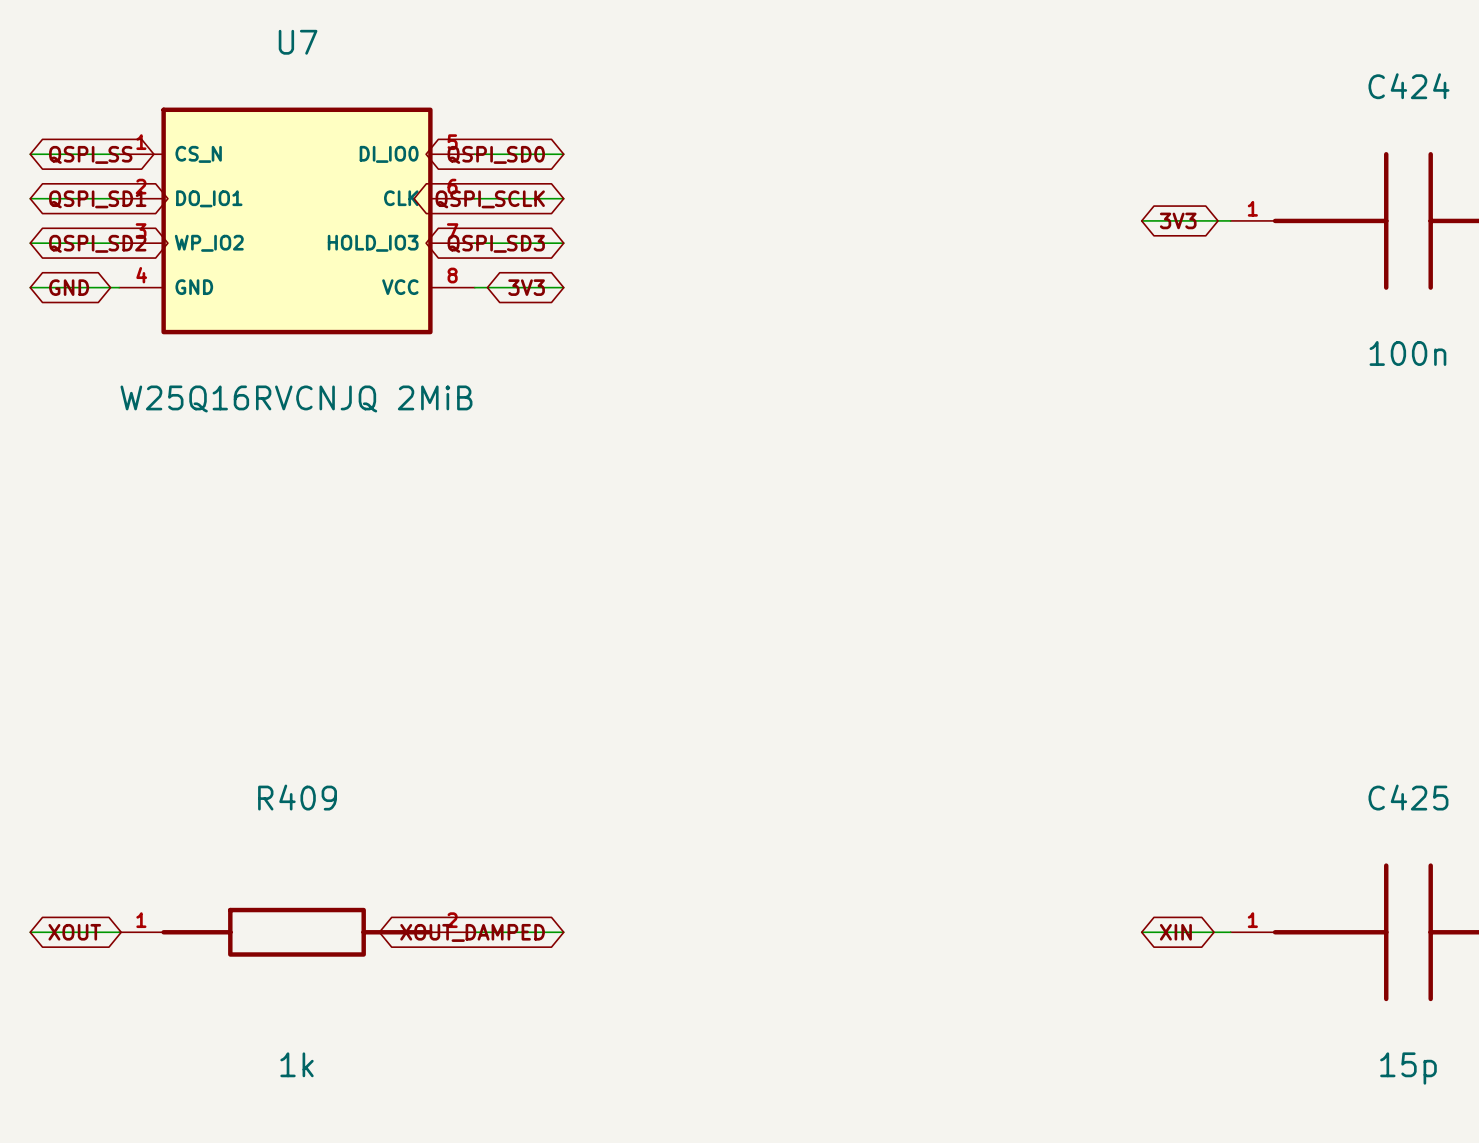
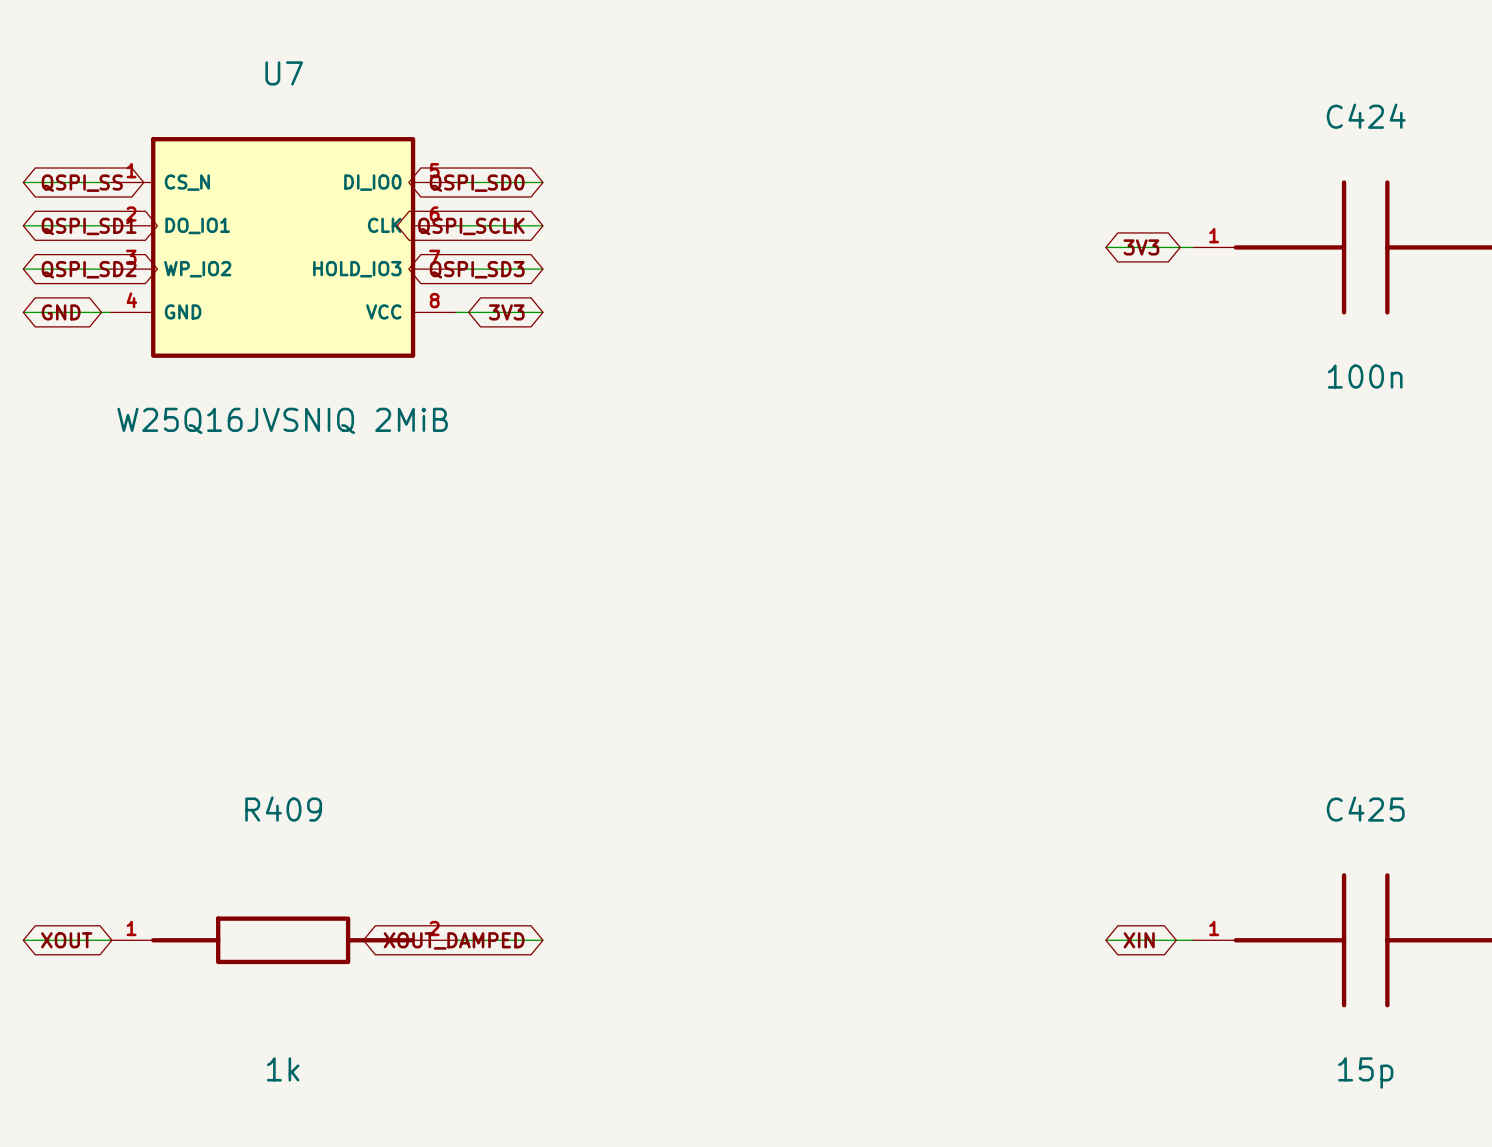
U7 value: W25Q16RVCNJQ 2MiB (296, 399) -> W25Q16JVSNIQ 2MiB (282, 420)

